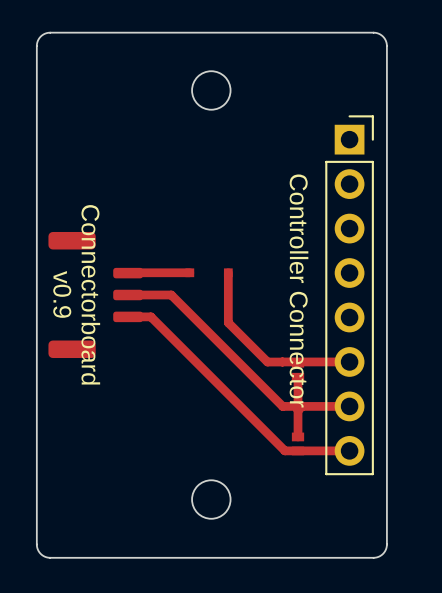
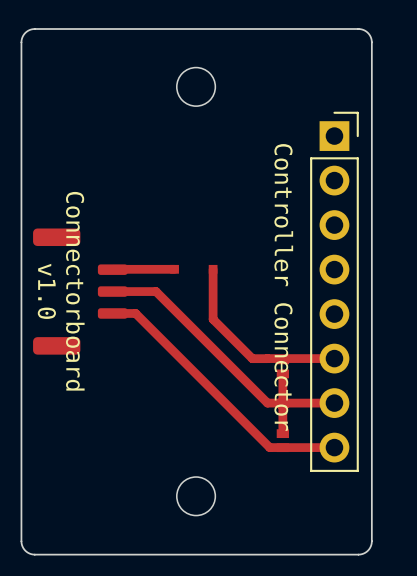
text: v0.9 (62, 294) -> v1.0 (46, 291)

